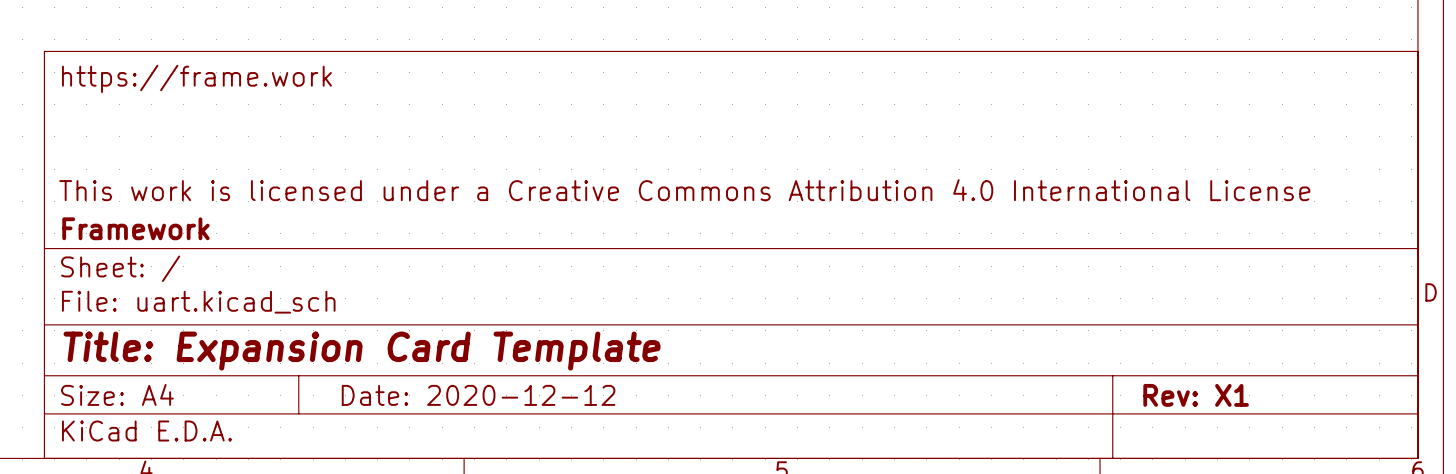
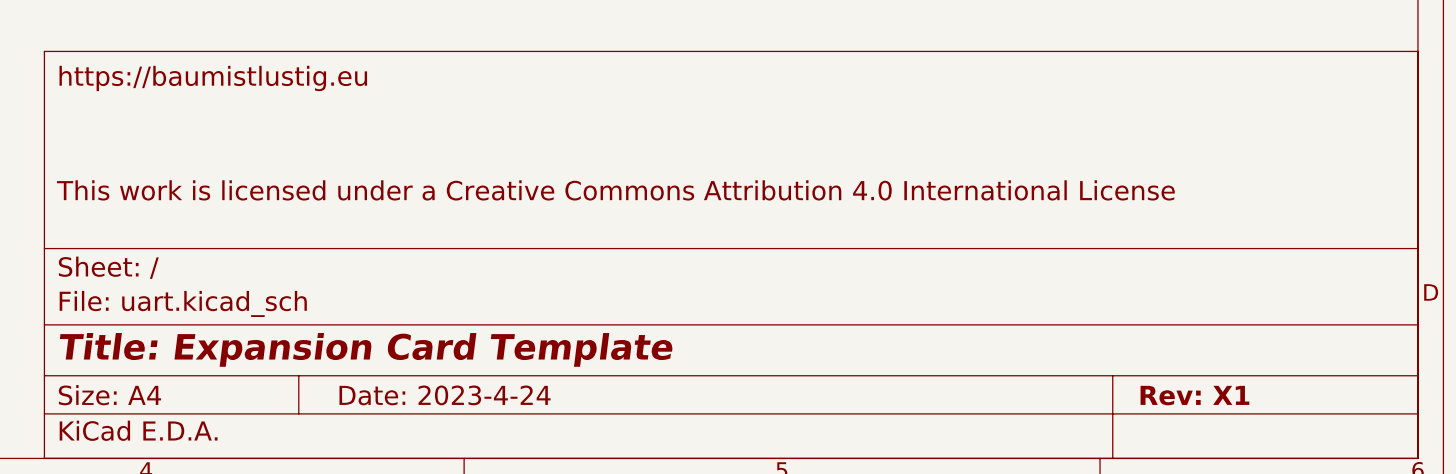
title block: https://frame.work (196, 78) -> https://baumistlustig.eu (213, 78)
title block: Framework (135, 228) -> none
title block: Date: 2020-12-12 (478, 395) -> Date: 2023-4-24 (445, 395)

